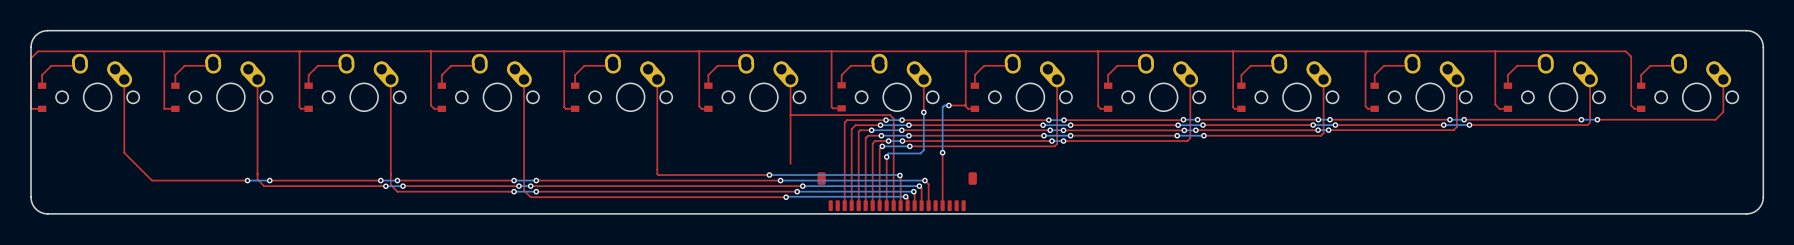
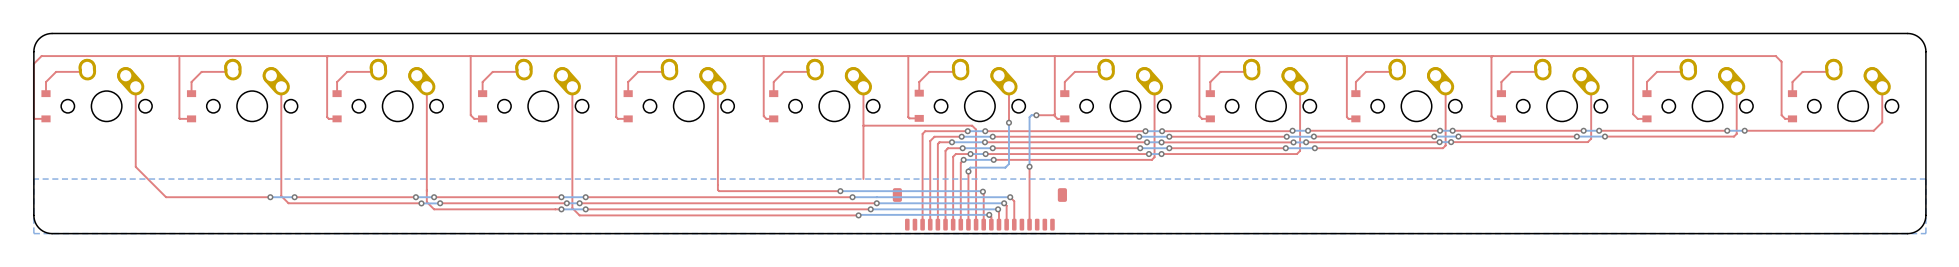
bottom zone outline: none -> (1925, 179) (1925, 233) (33, 233) (33, 179) (1925, 179)

